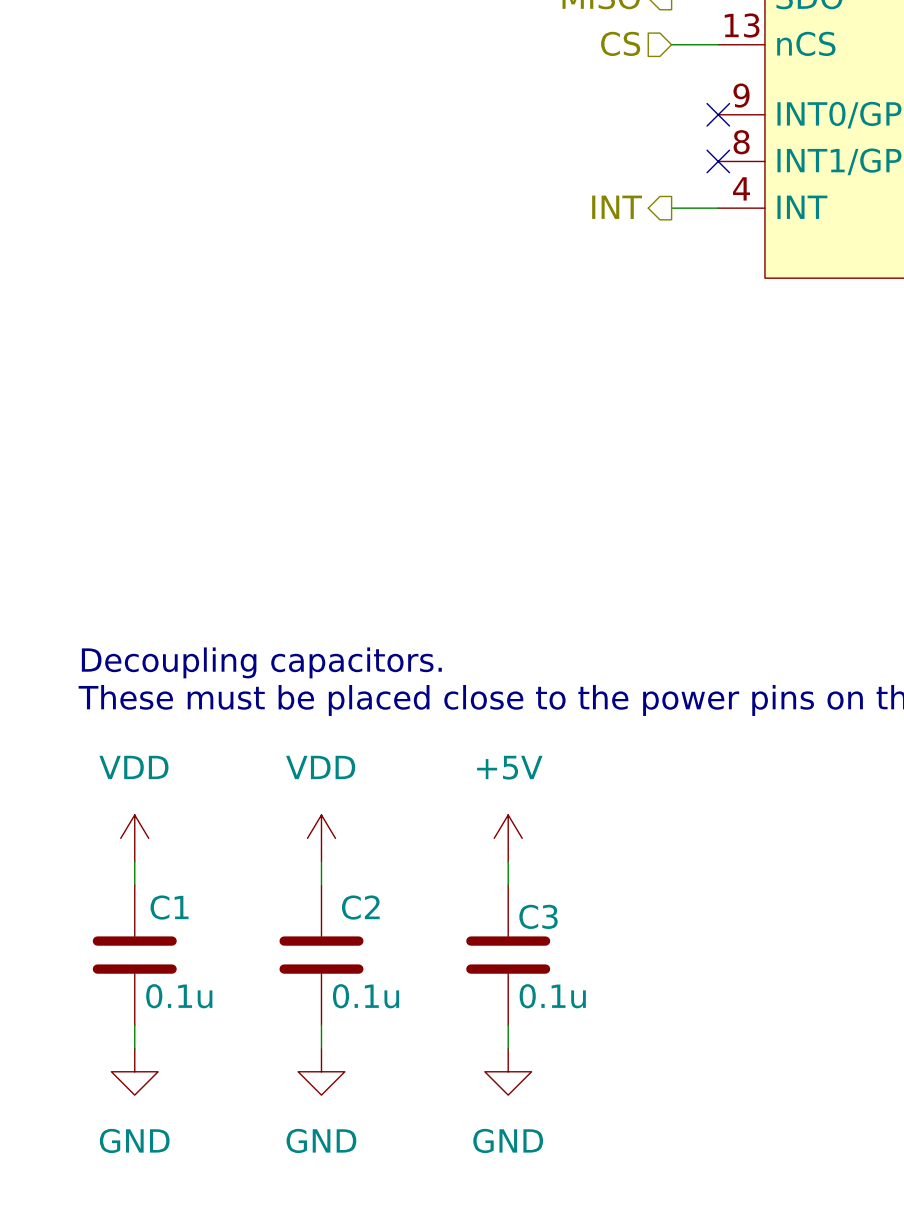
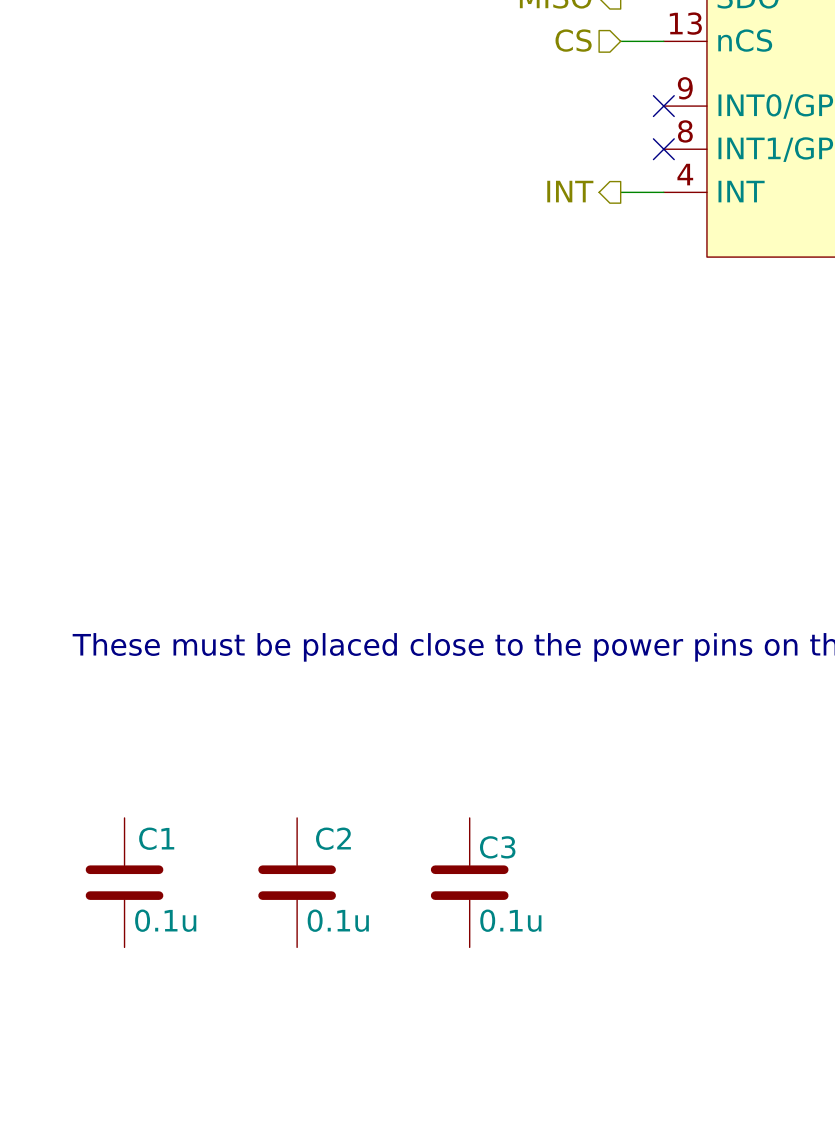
text: Decoupling capacitors. (261, 662) -> none
power symbol: VDD (134, 838) -> none
power symbol: VDD (321, 838) -> none
power symbol: +5V (508, 838) -> none
wire: (134, 861) (134, 885) -> none
wire: (321, 861) (321, 885) -> none
wire: (508, 861) (508, 885) -> none
wire: (134, 1025) (134, 1048) -> none
wire: (321, 1025) (321, 1048) -> none
wire: (508, 1025) (508, 1048) -> none
power symbol: GND (134, 1071) -> none
power symbol: GND (321, 1071) -> none
power symbol: GND (508, 1071) -> none

